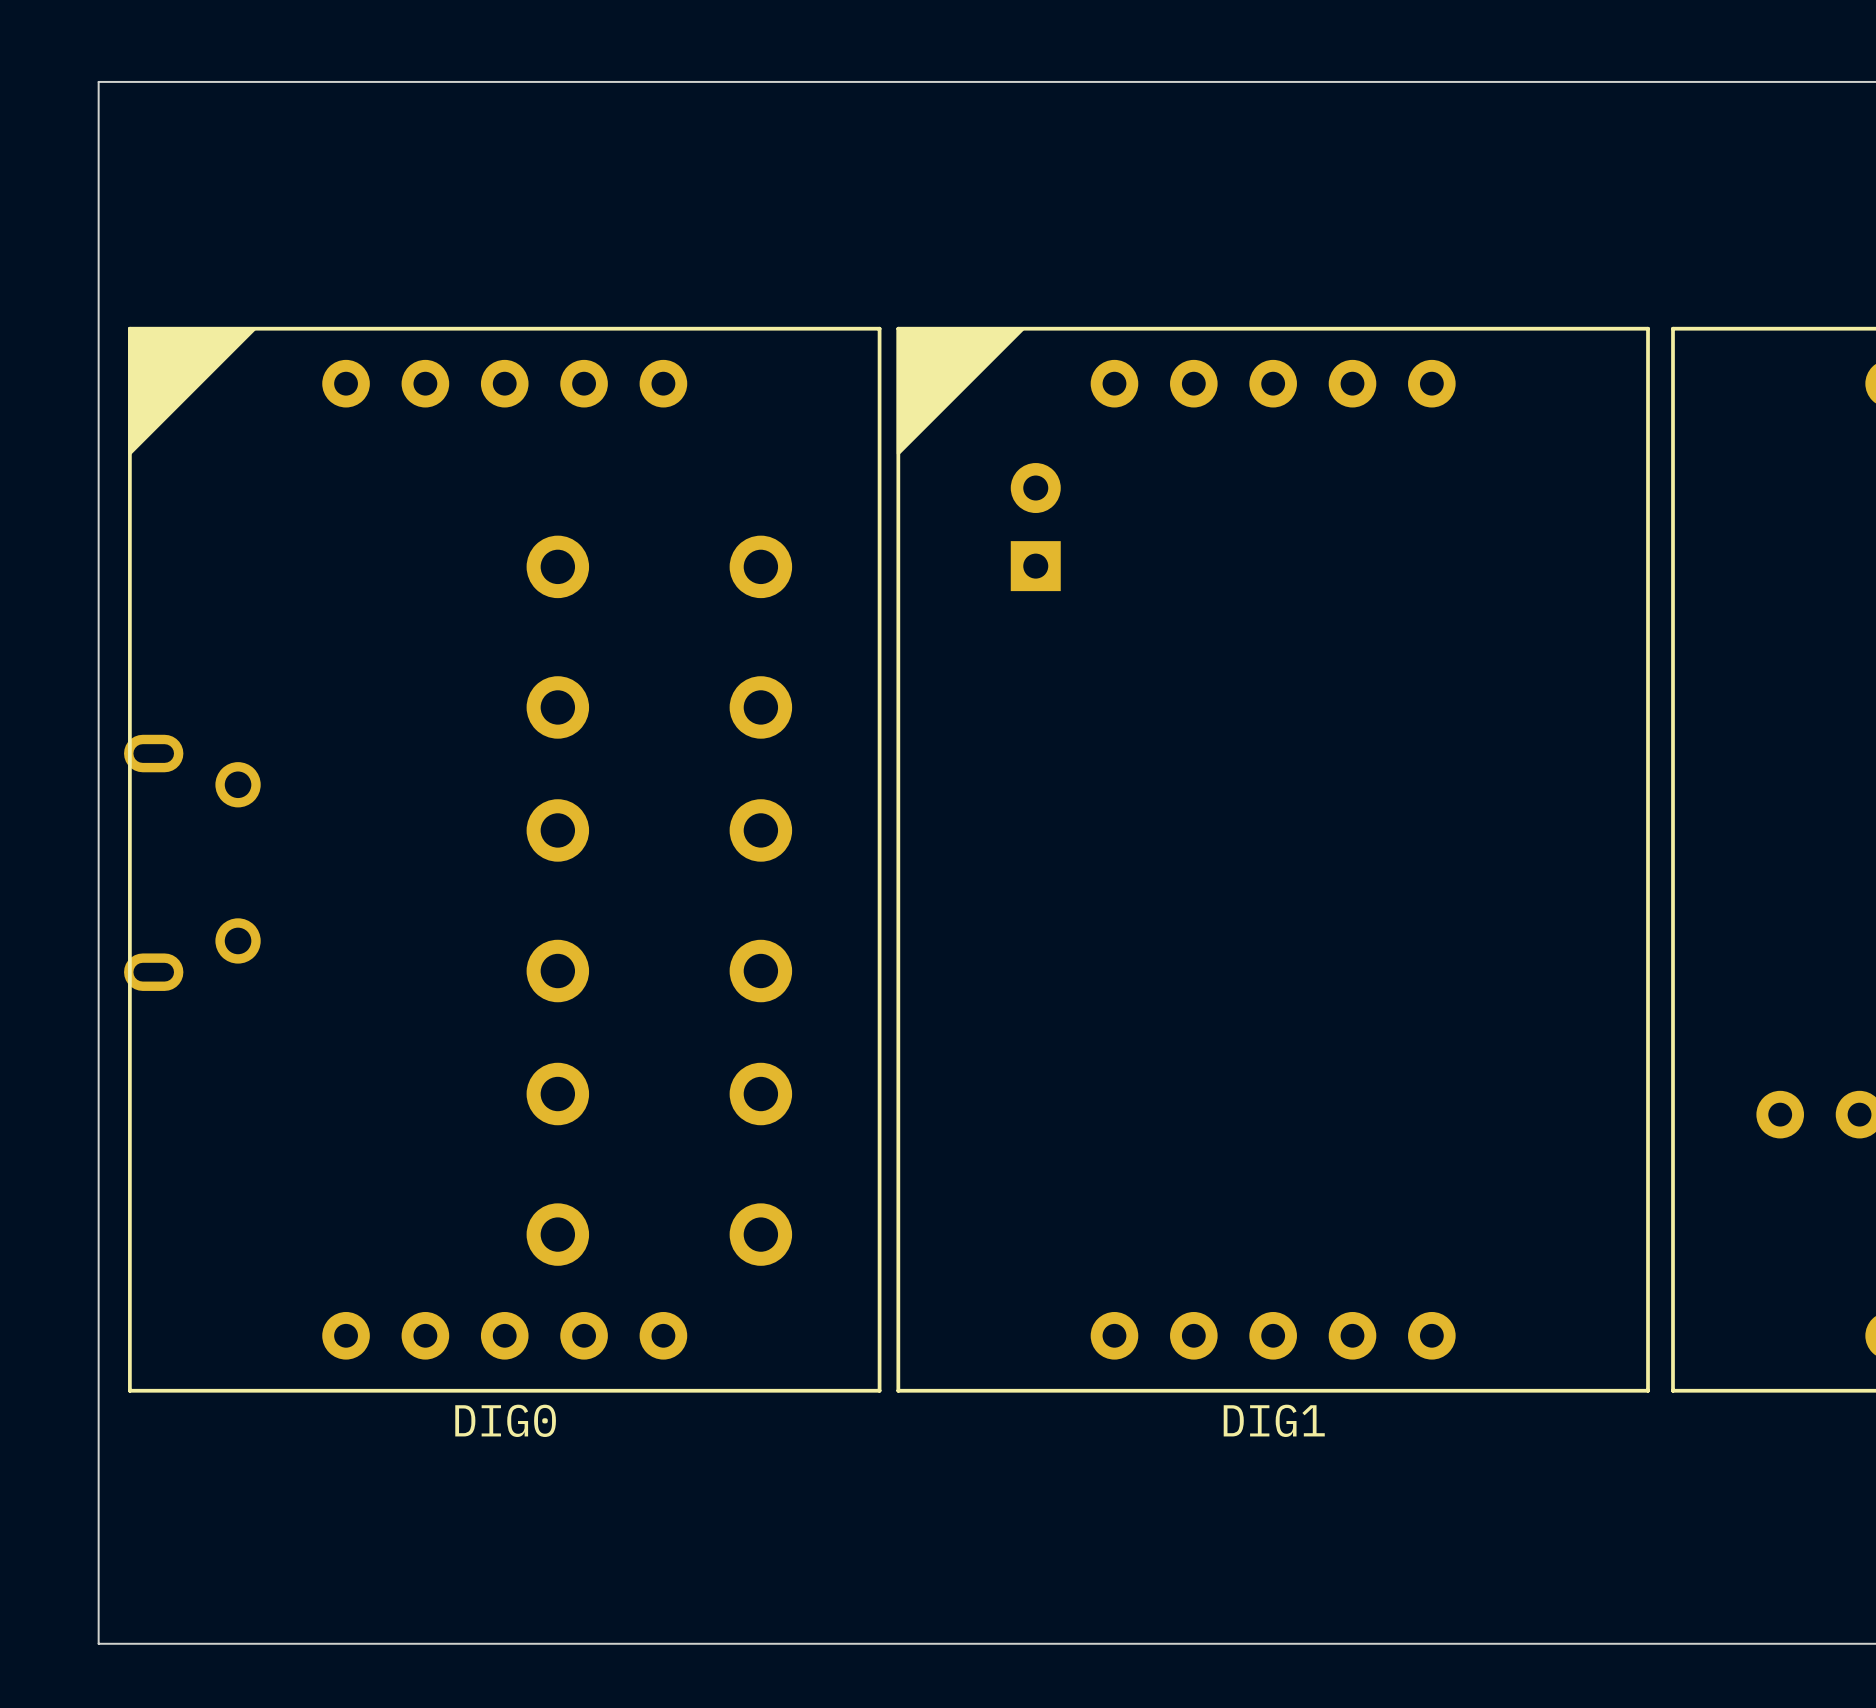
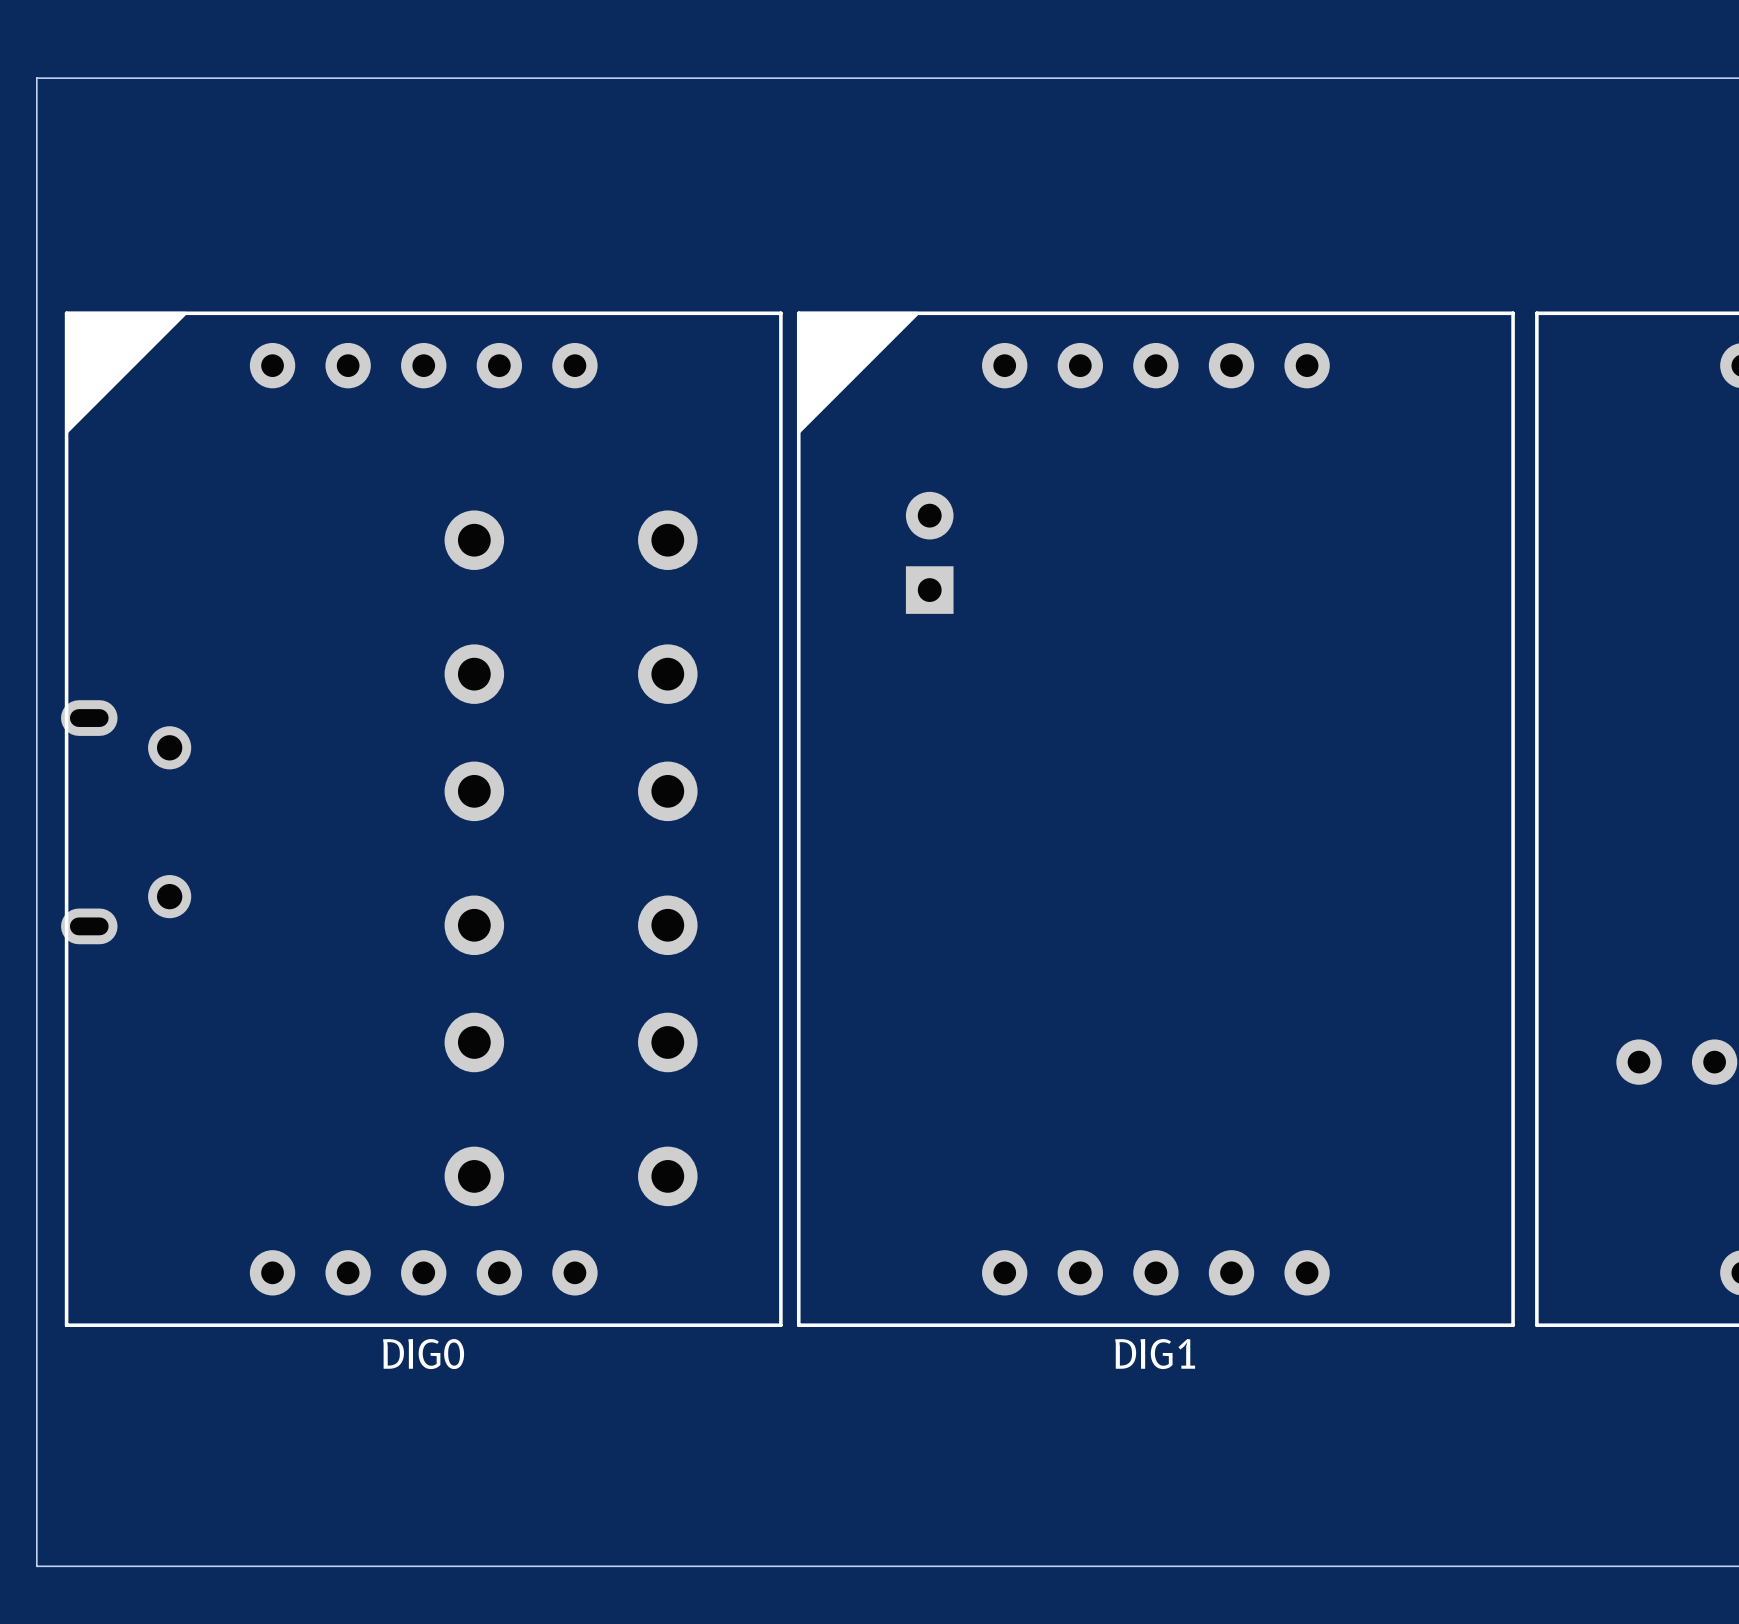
part position: (1035, 527) -> (929, 552)

